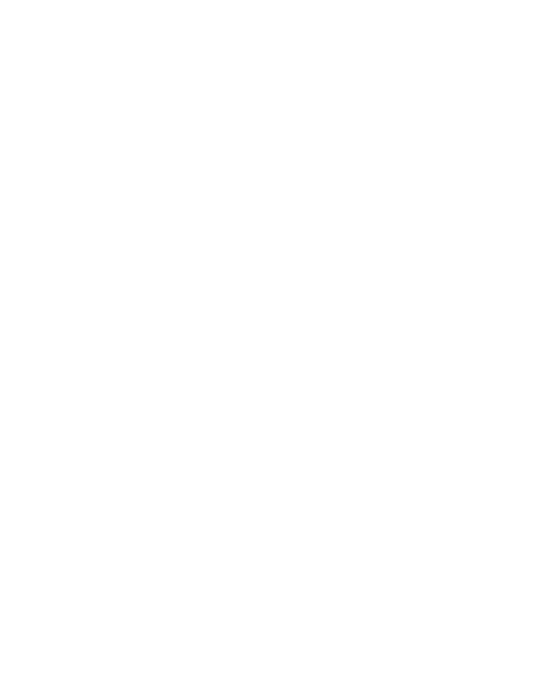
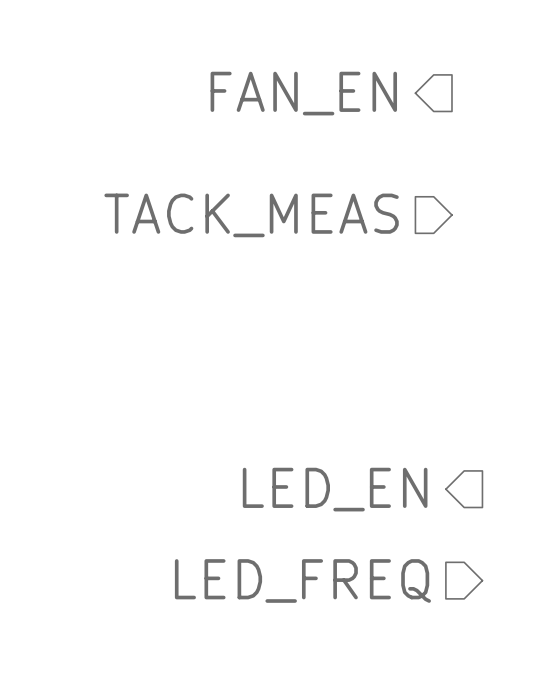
hierarchical label: none -> FAN_EN (303, 93)
hierarchical label: none -> TACK_MEAS (251, 215)
hierarchical label: none -> LED_EN (335, 489)
hierarchical label: none -> LED_FREQ (302, 580)

